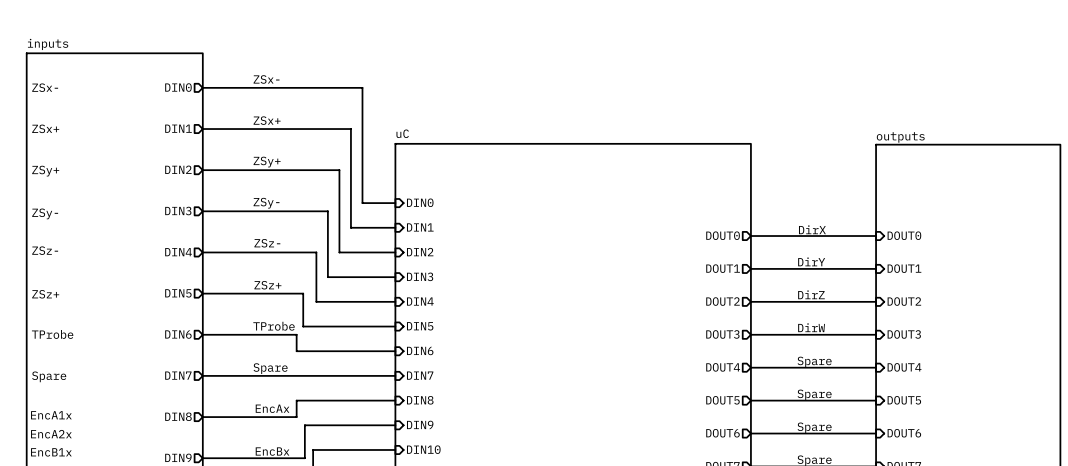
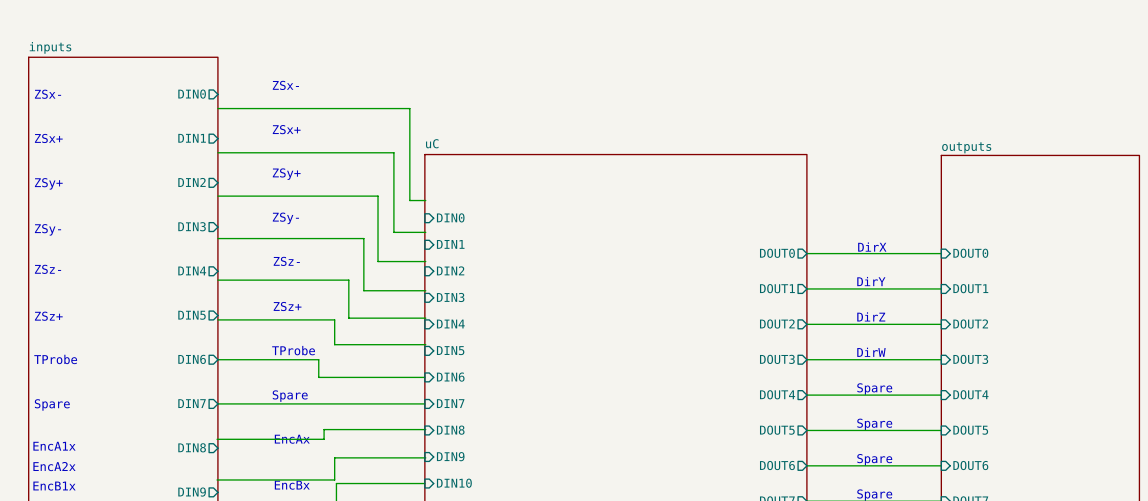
wire: (202, 87) (362, 87) (362, 203) (395, 203) -> none
wire: none -> (217, 108) (409, 108) (409, 200) (425, 200)
wire: (202, 129) (350, 129) (350, 227) (395, 227) -> none
wire: none -> (217, 152) (393, 152) (393, 232) (425, 232)
wire: (202, 170) (339, 170) (339, 252) (395, 252) -> none
wire: none -> (217, 196) (378, 196) (378, 261) (425, 261)
wire: (202, 211) (327, 211) (327, 277) (395, 277) -> none
wire: none -> (217, 238) (363, 238) (363, 290) (425, 290)
wire: (202, 252) (316, 252) (316, 301) (395, 301) -> none
wire: none -> (217, 280) (348, 280) (348, 318) (425, 318)
wire: (202, 293) (303, 293) (303, 326) (395, 326) -> none
wire: none -> (217, 319) (334, 319) (334, 344) (425, 344)
wire: none -> (425, 429) (324, 429) (324, 439) (217, 439)
wire: (395, 400) (296, 400) (296, 417) (202, 417) -> none
wire: (395, 425) (304, 425) (304, 458) (202, 458) -> none
wire: none -> (425, 457) (334, 457) (334, 479) (217, 479)

